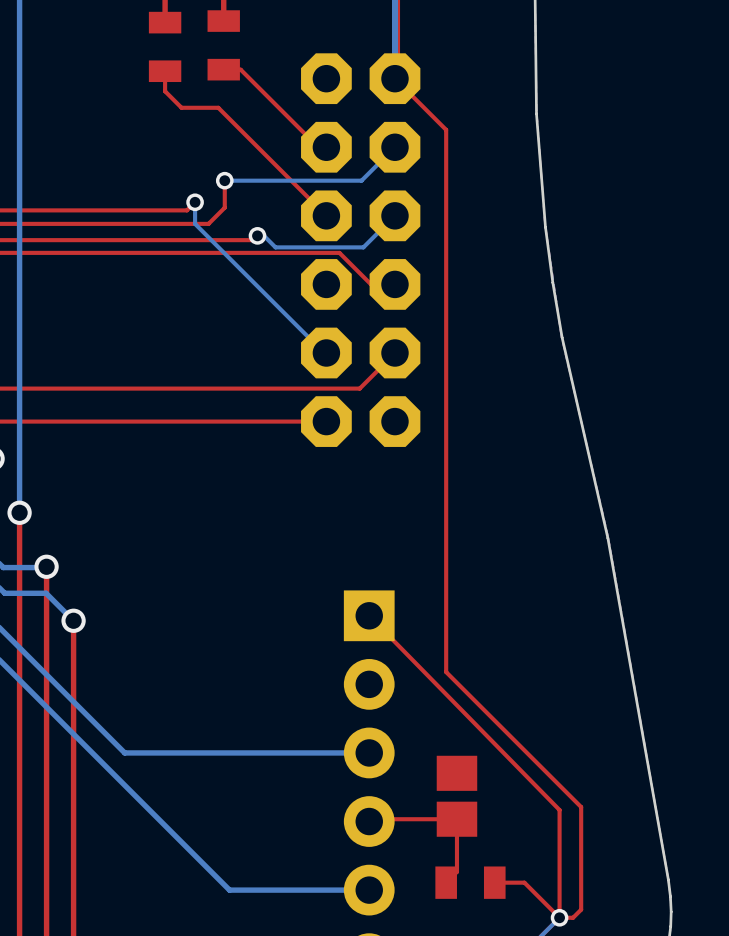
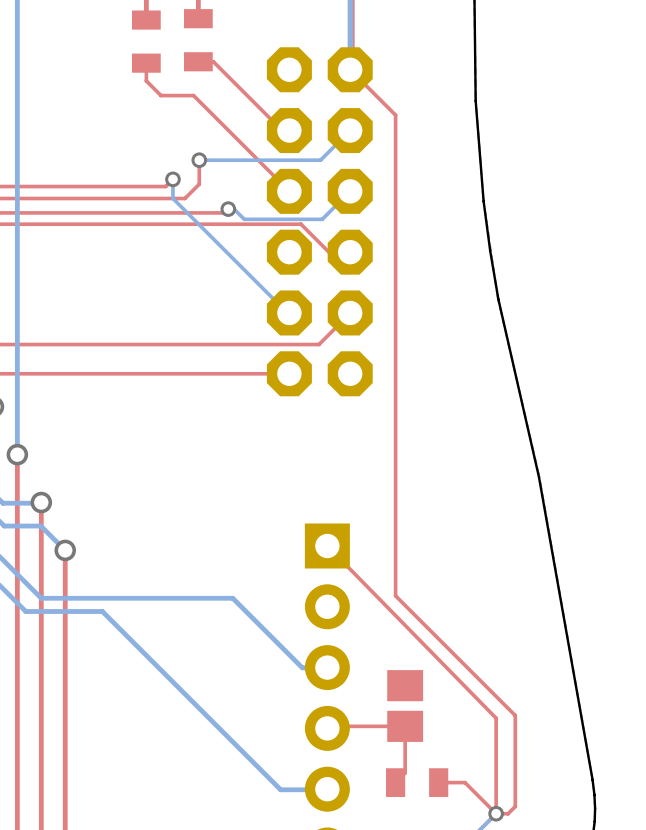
bottom track: (46, 674) (124, 752) (369, 752) -> (41, 598) (232, 598) (302, 667) (327, 667)
bottom track: (29, 689) (229, 890) (369, 890) -> (25, 611) (102, 611) (280, 789) (327, 789)

